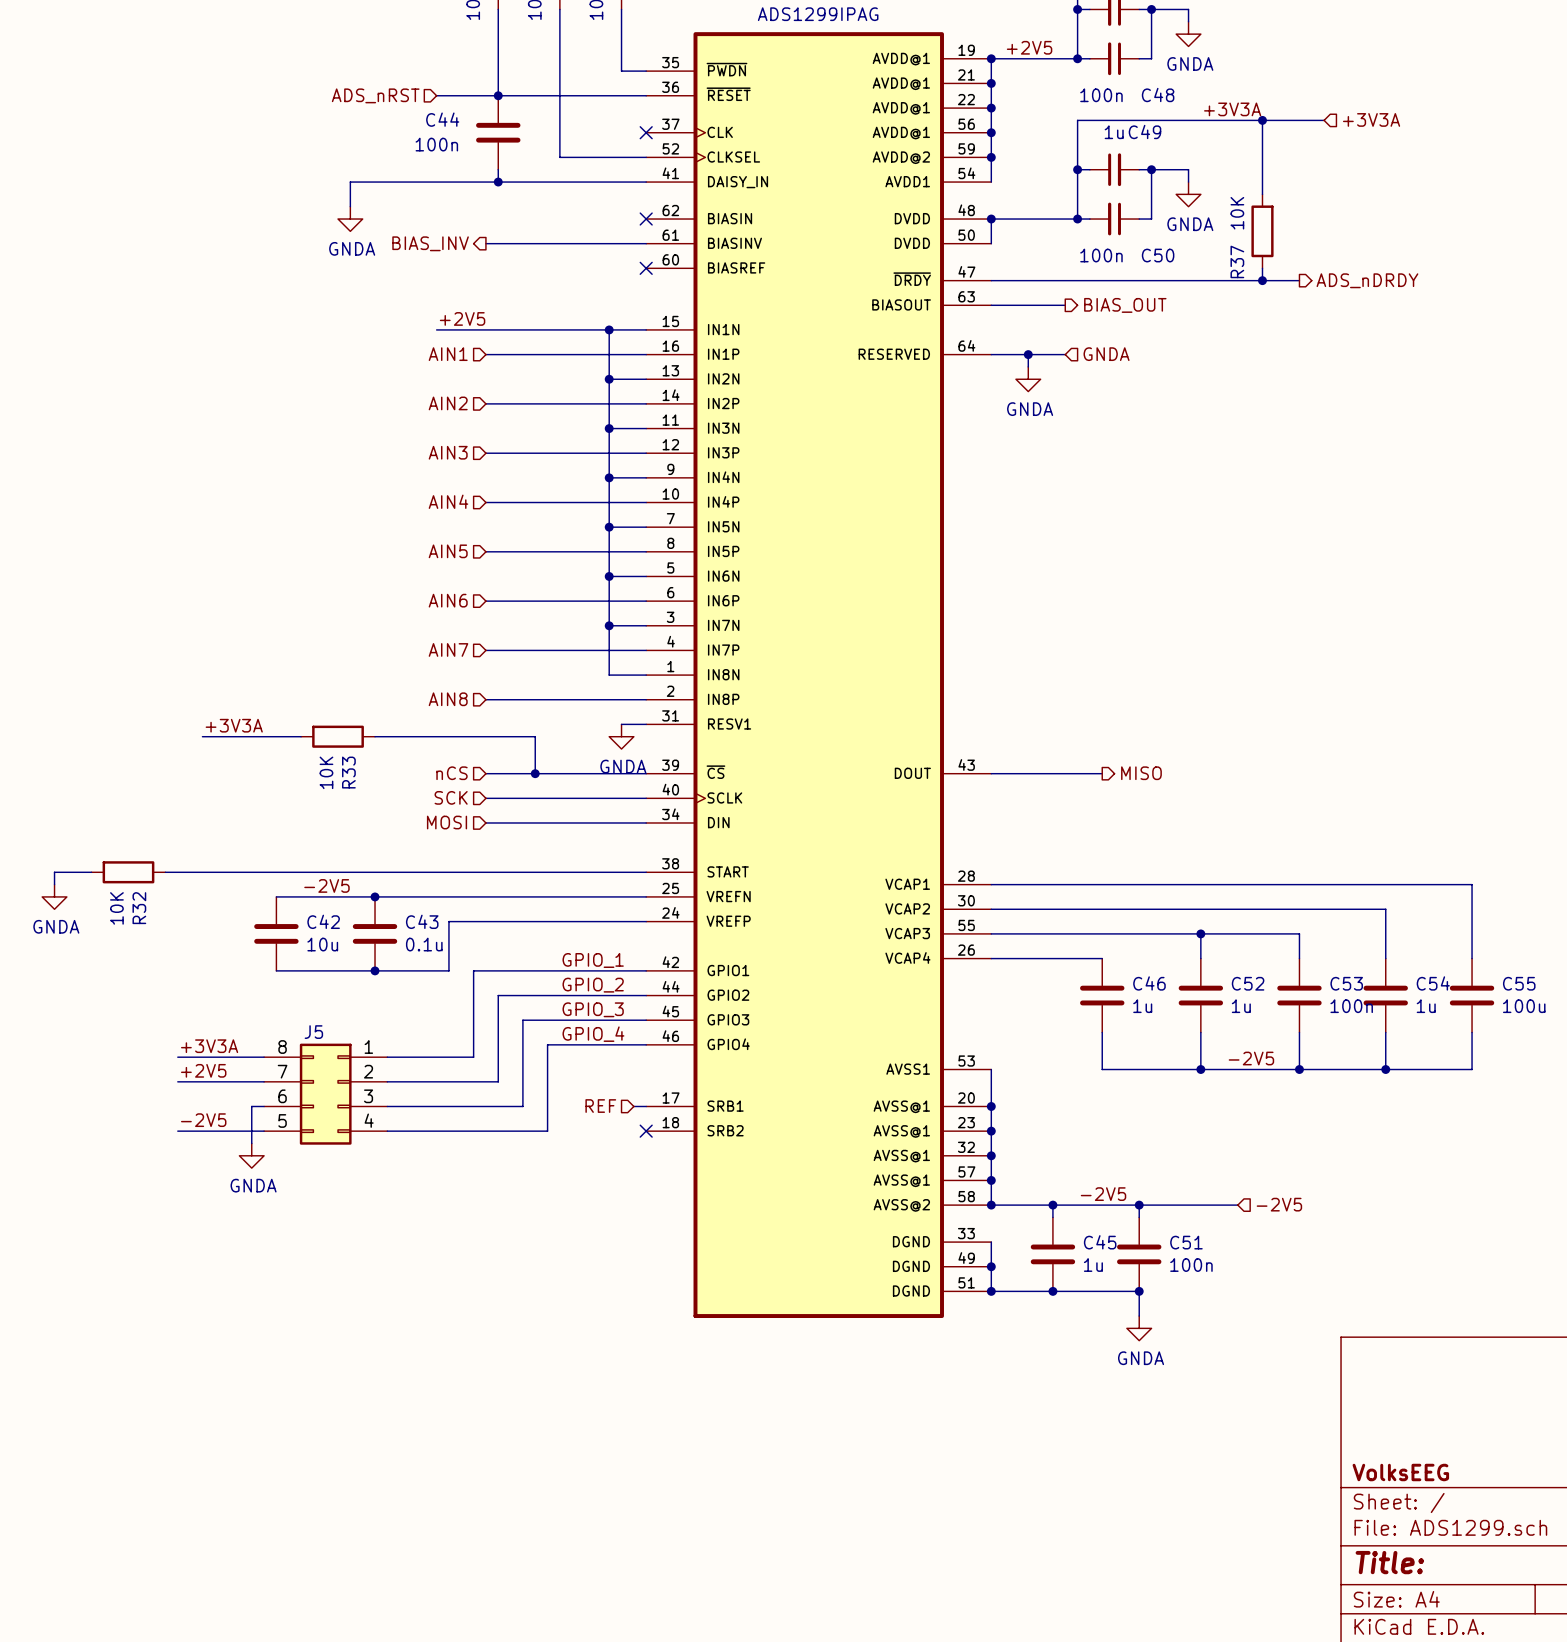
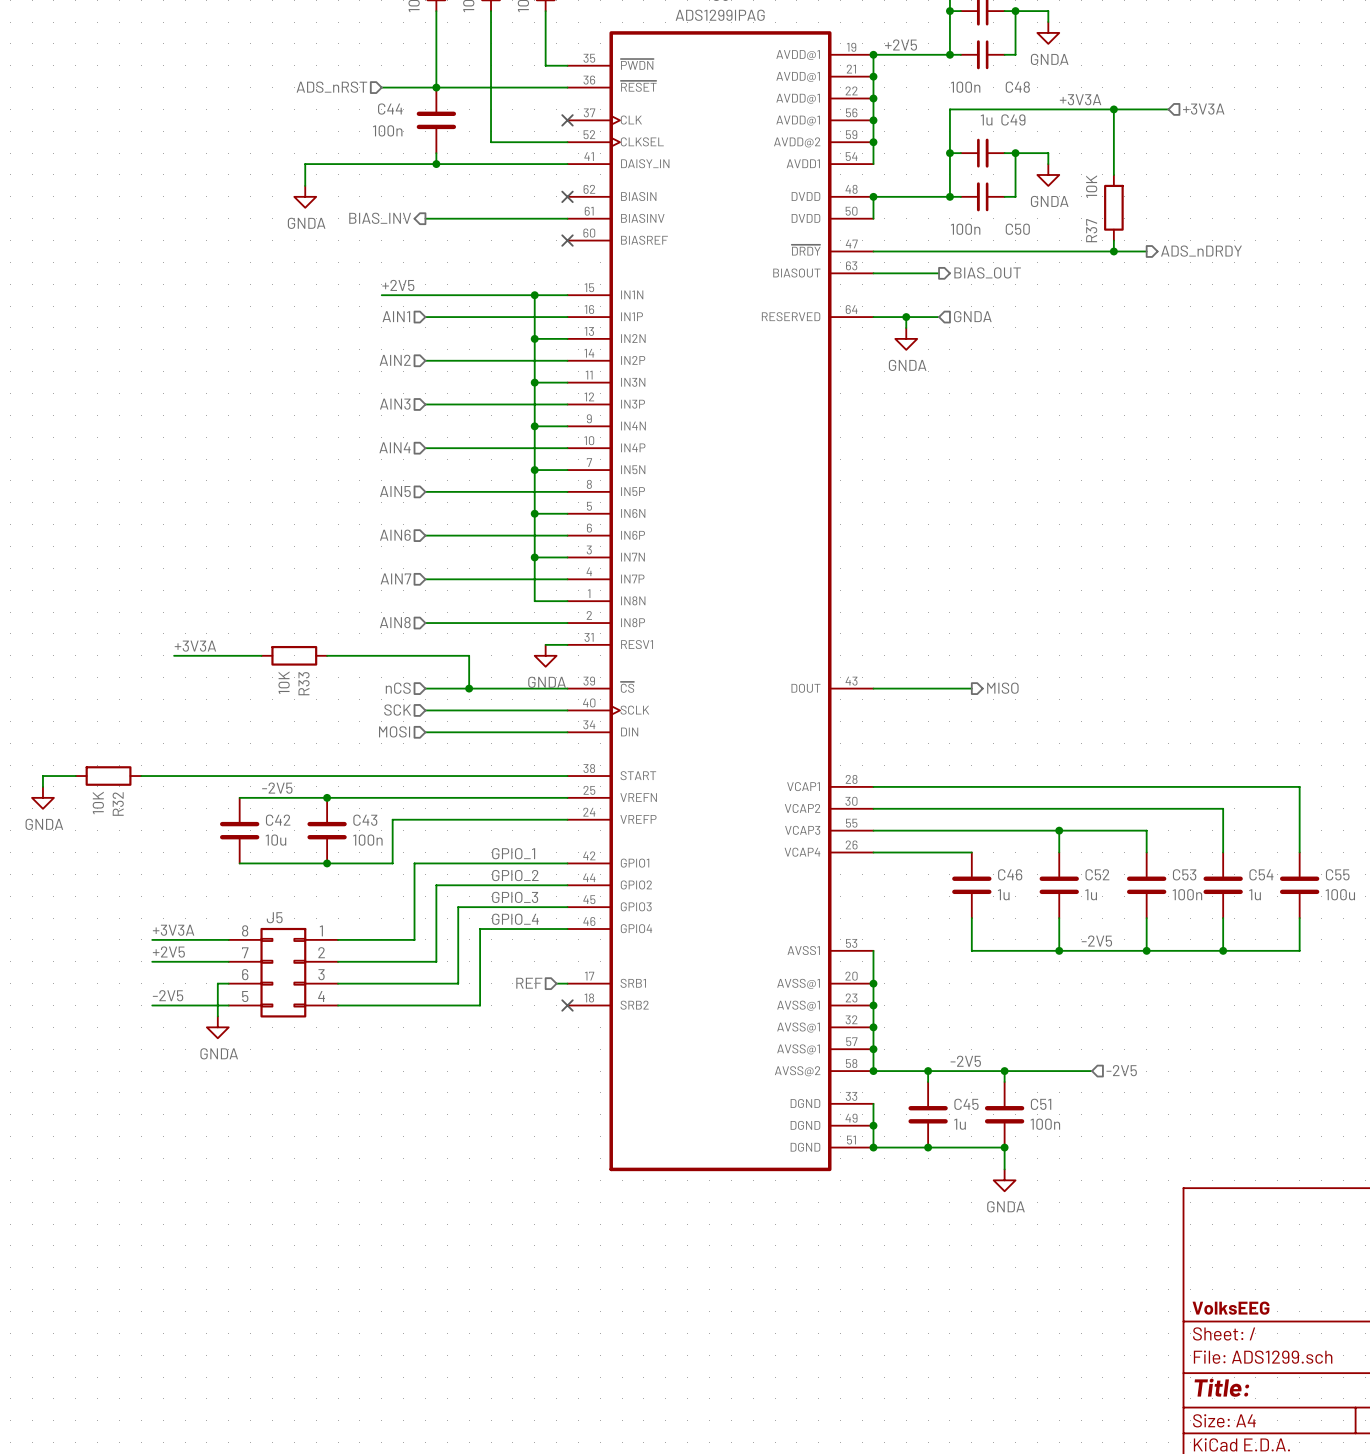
C43 value: 0.1u (424, 944) -> 100n (367, 840)

